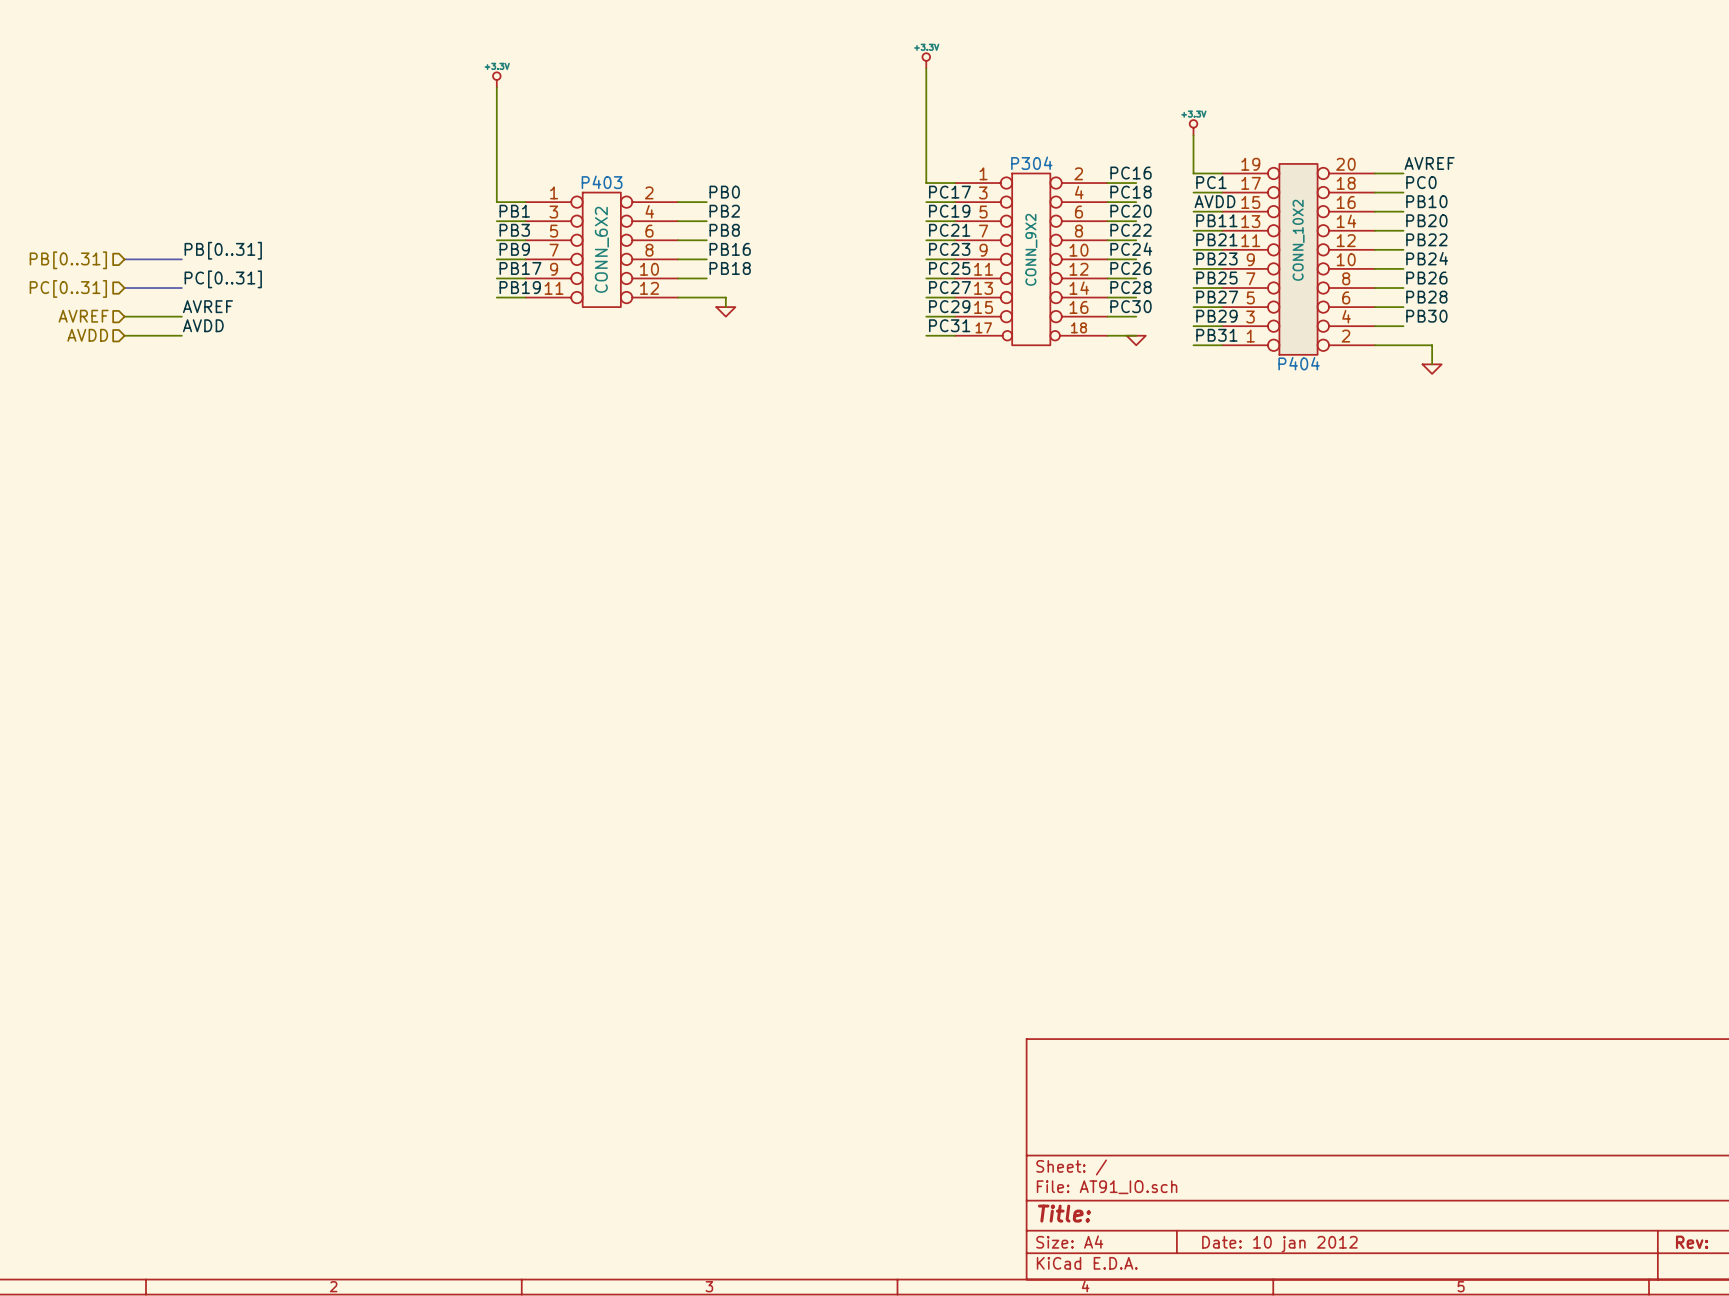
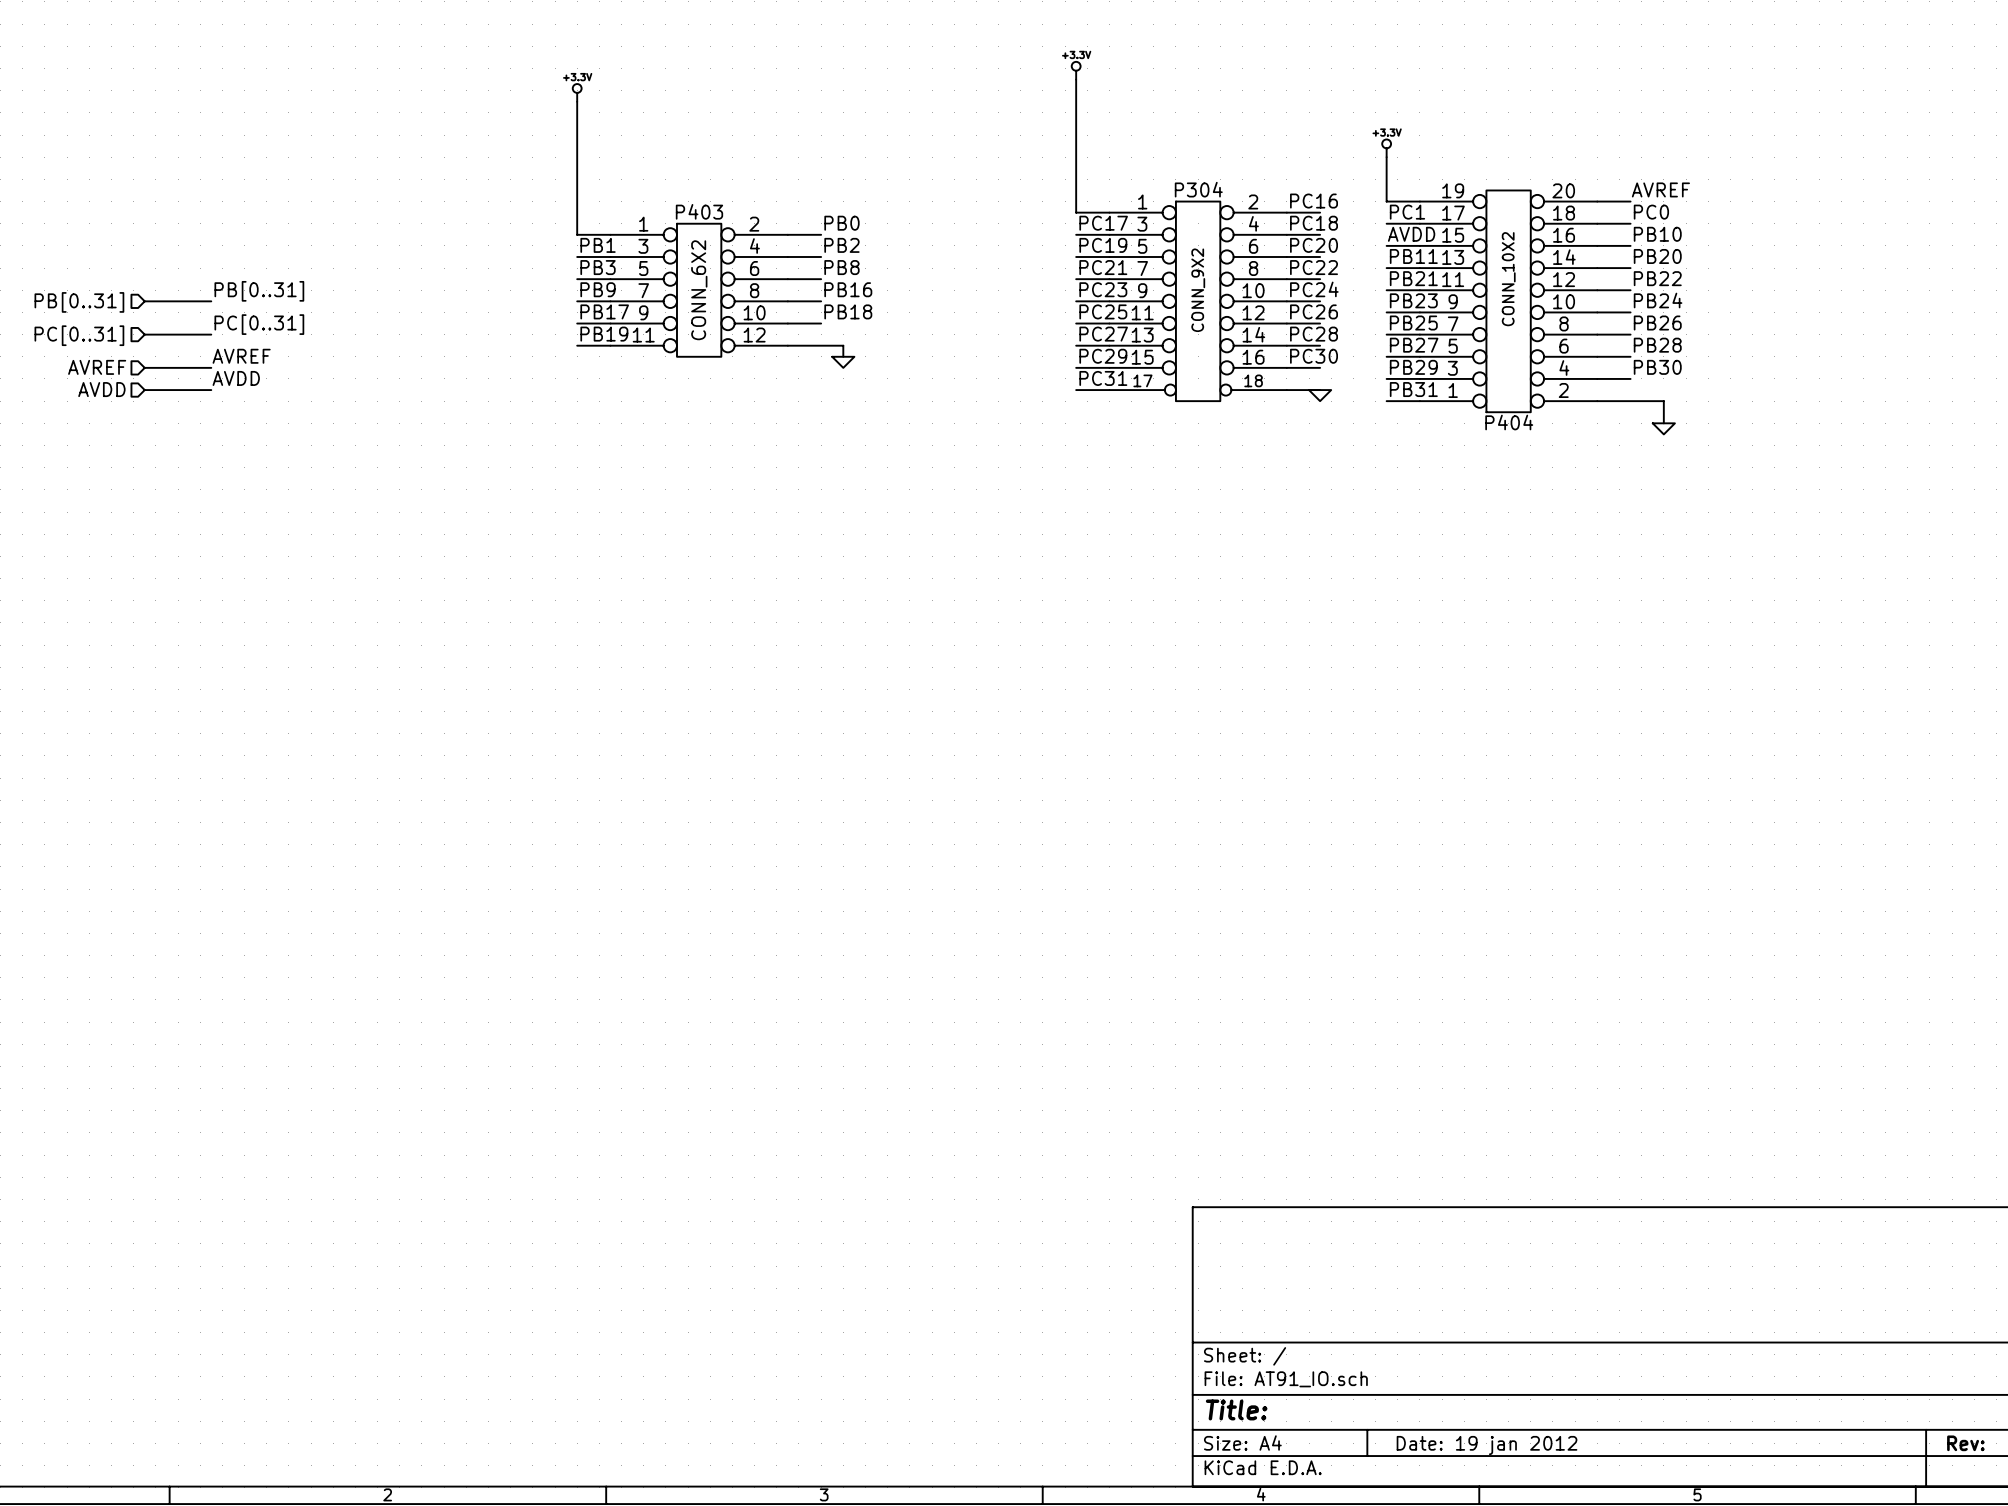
title block: Date: 10 jan 2012 (1279, 1244) -> Date: 19 jan 2012 (1487, 1445)

